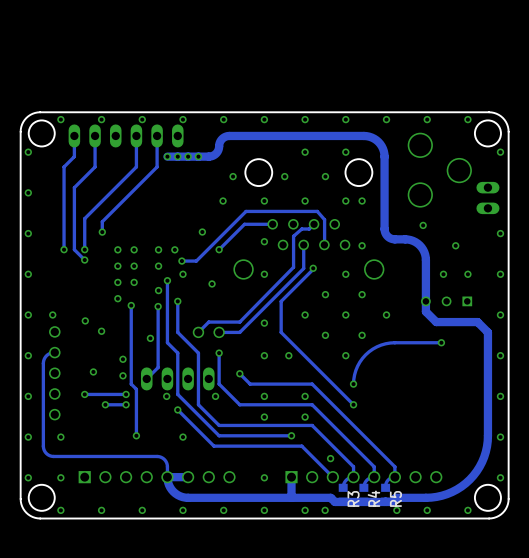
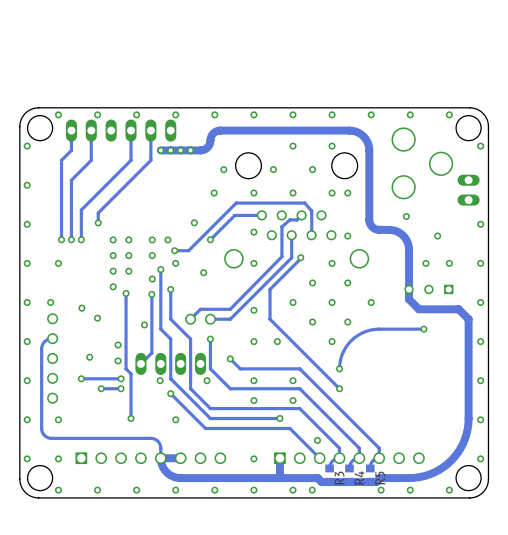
track: (74, 249) (85, 260) -> none
via: none -> (71, 239)
via: (84, 260) -> none
via: none -> (58, 263)

